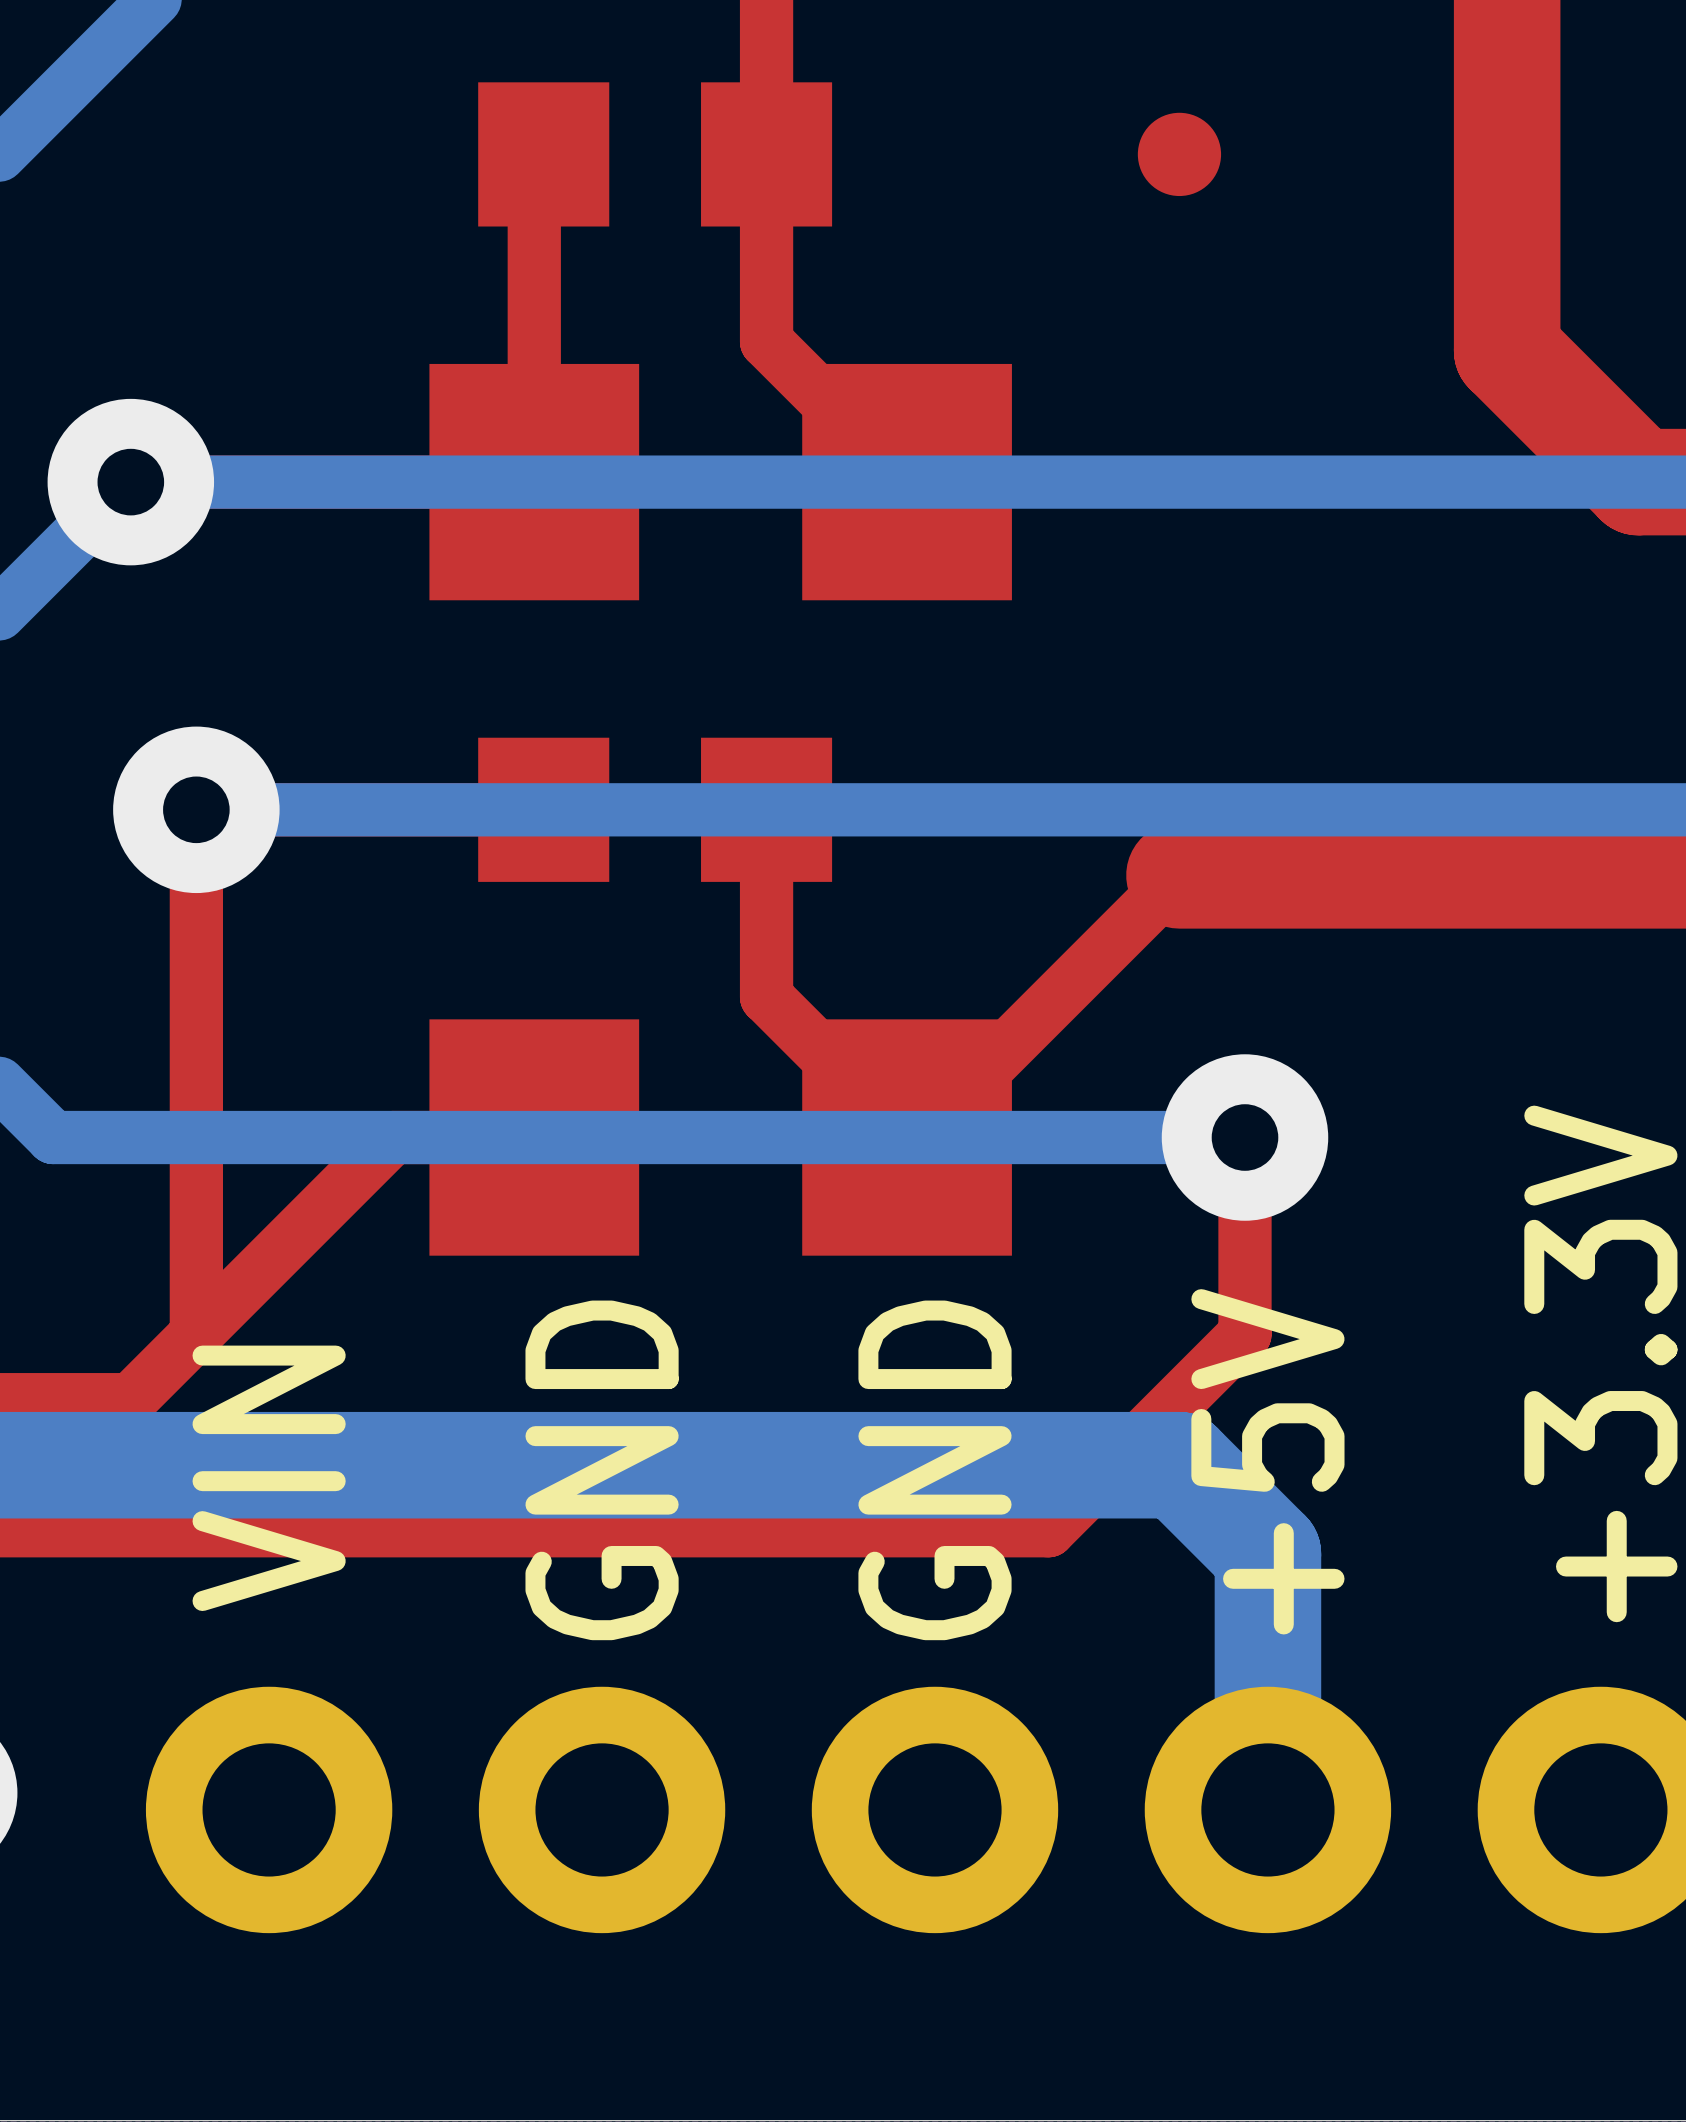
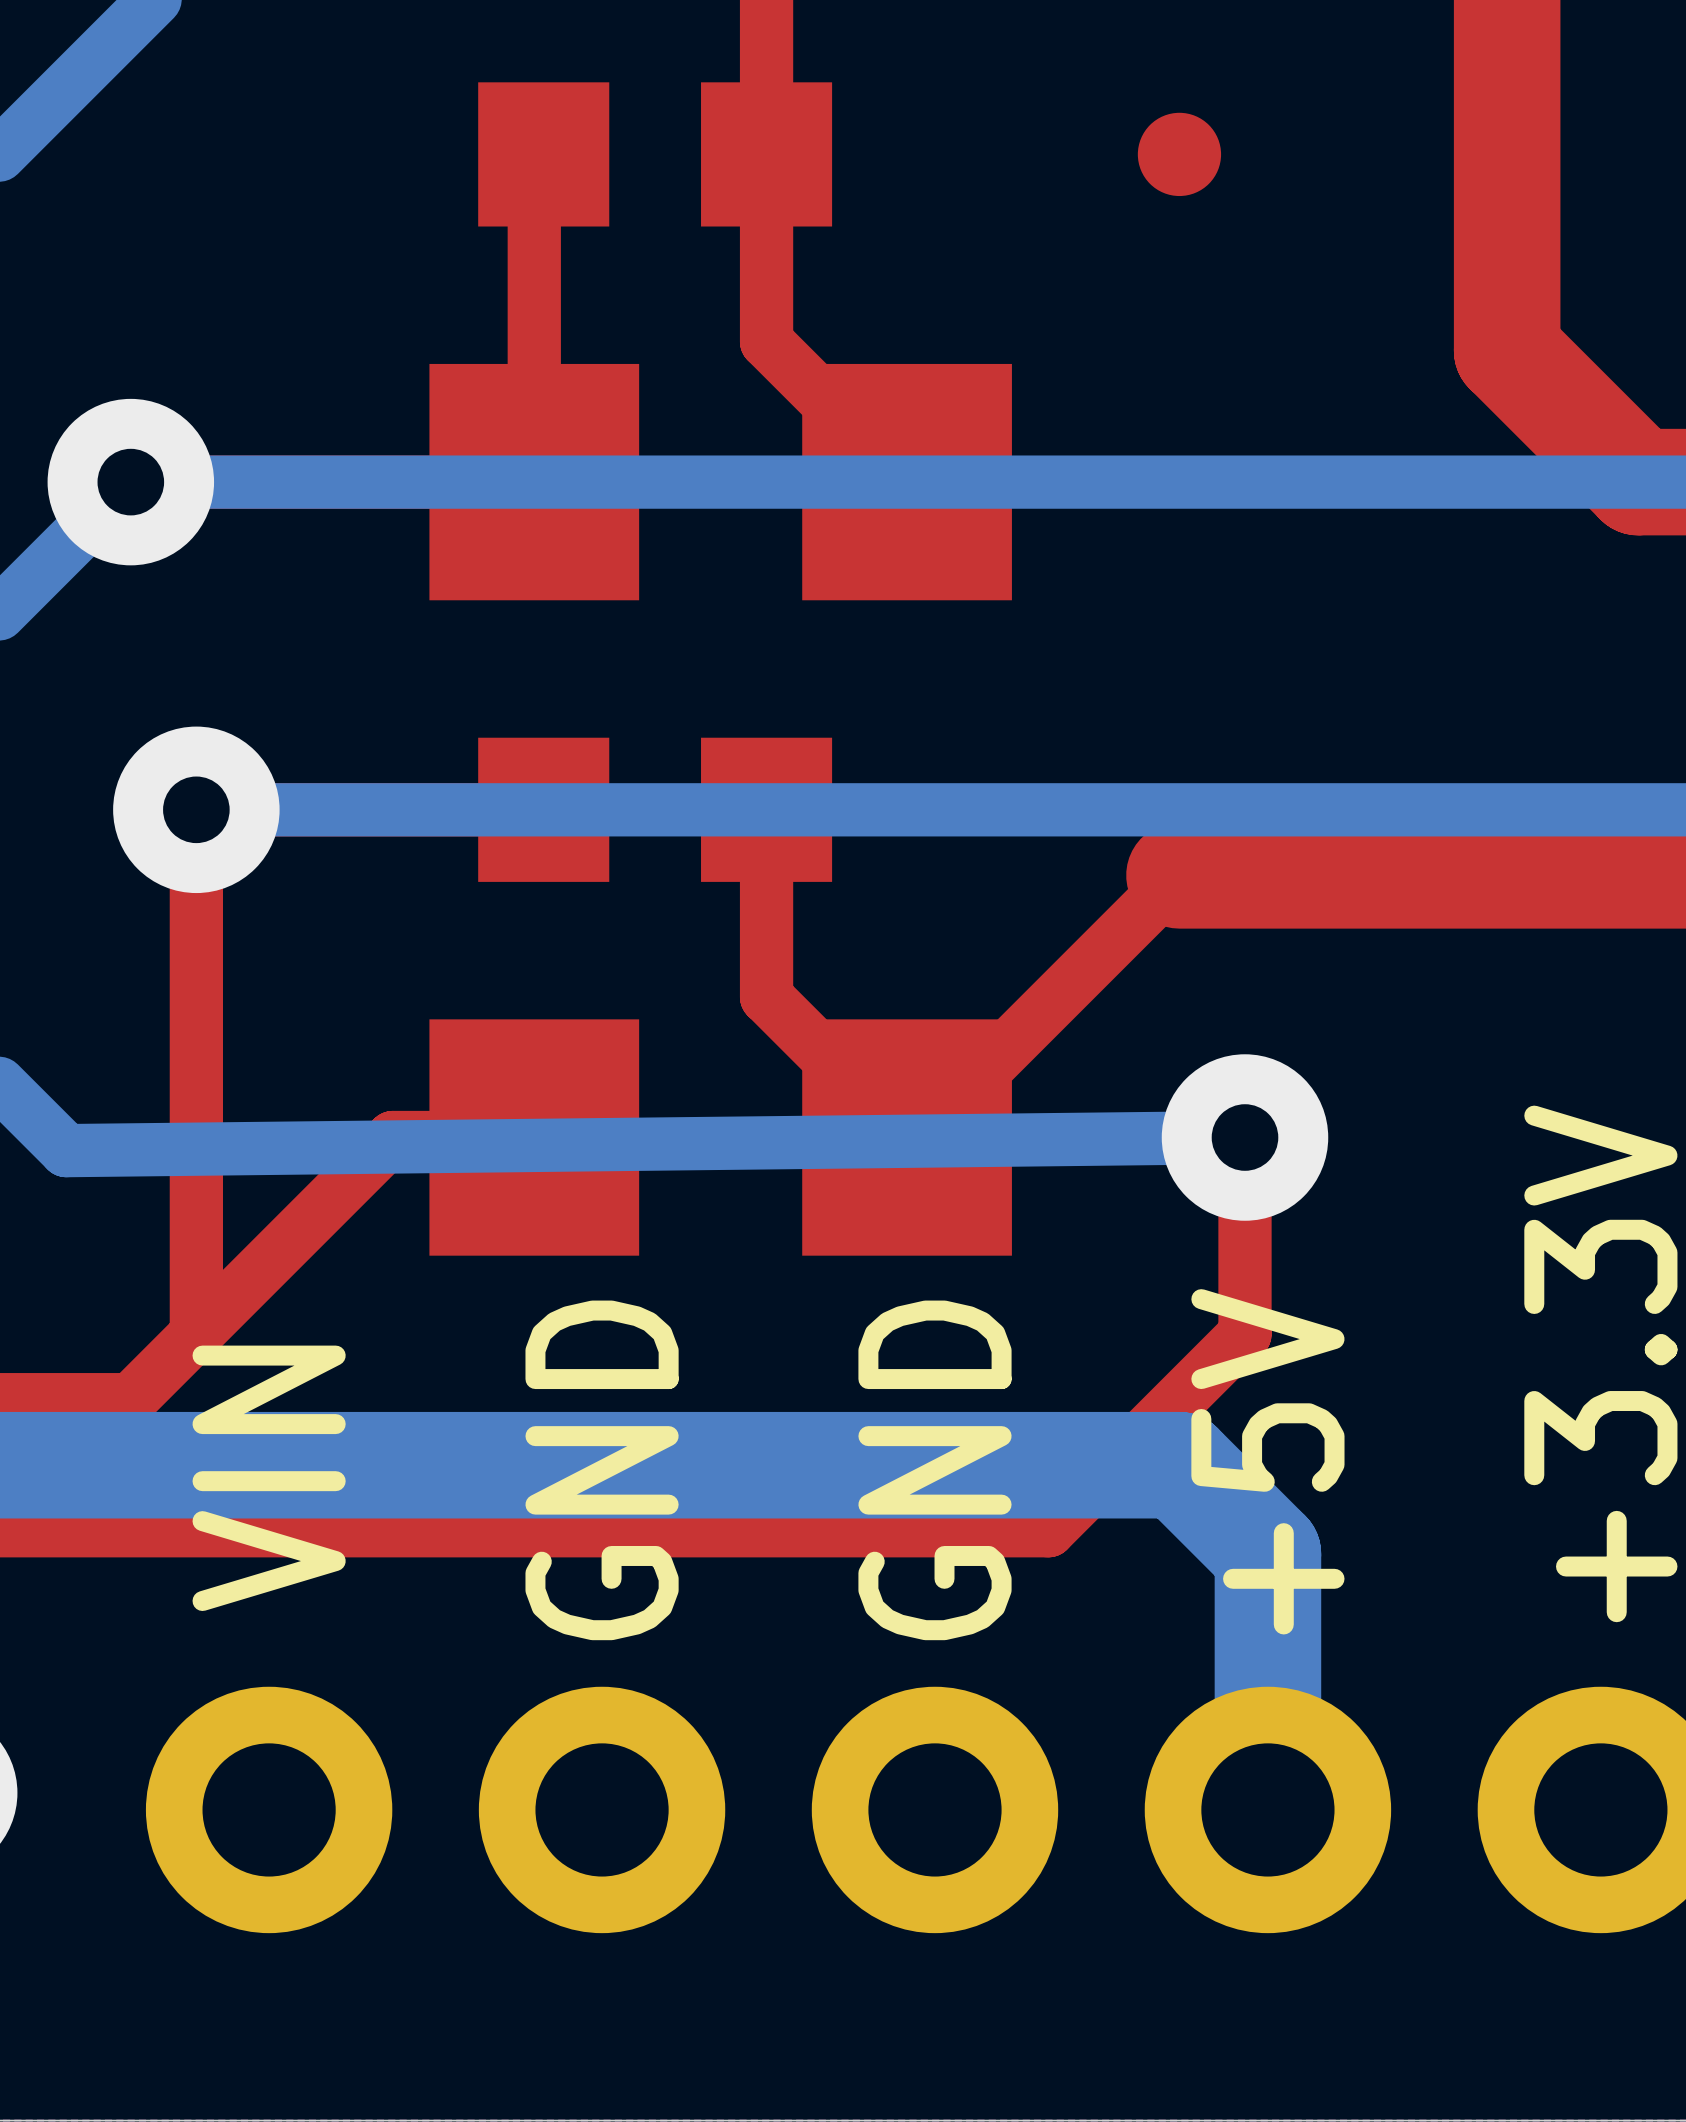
bottom track: (1245, 1137) (53, 1137) -> (1245, 1137) (66, 1150) (53, 1137)

